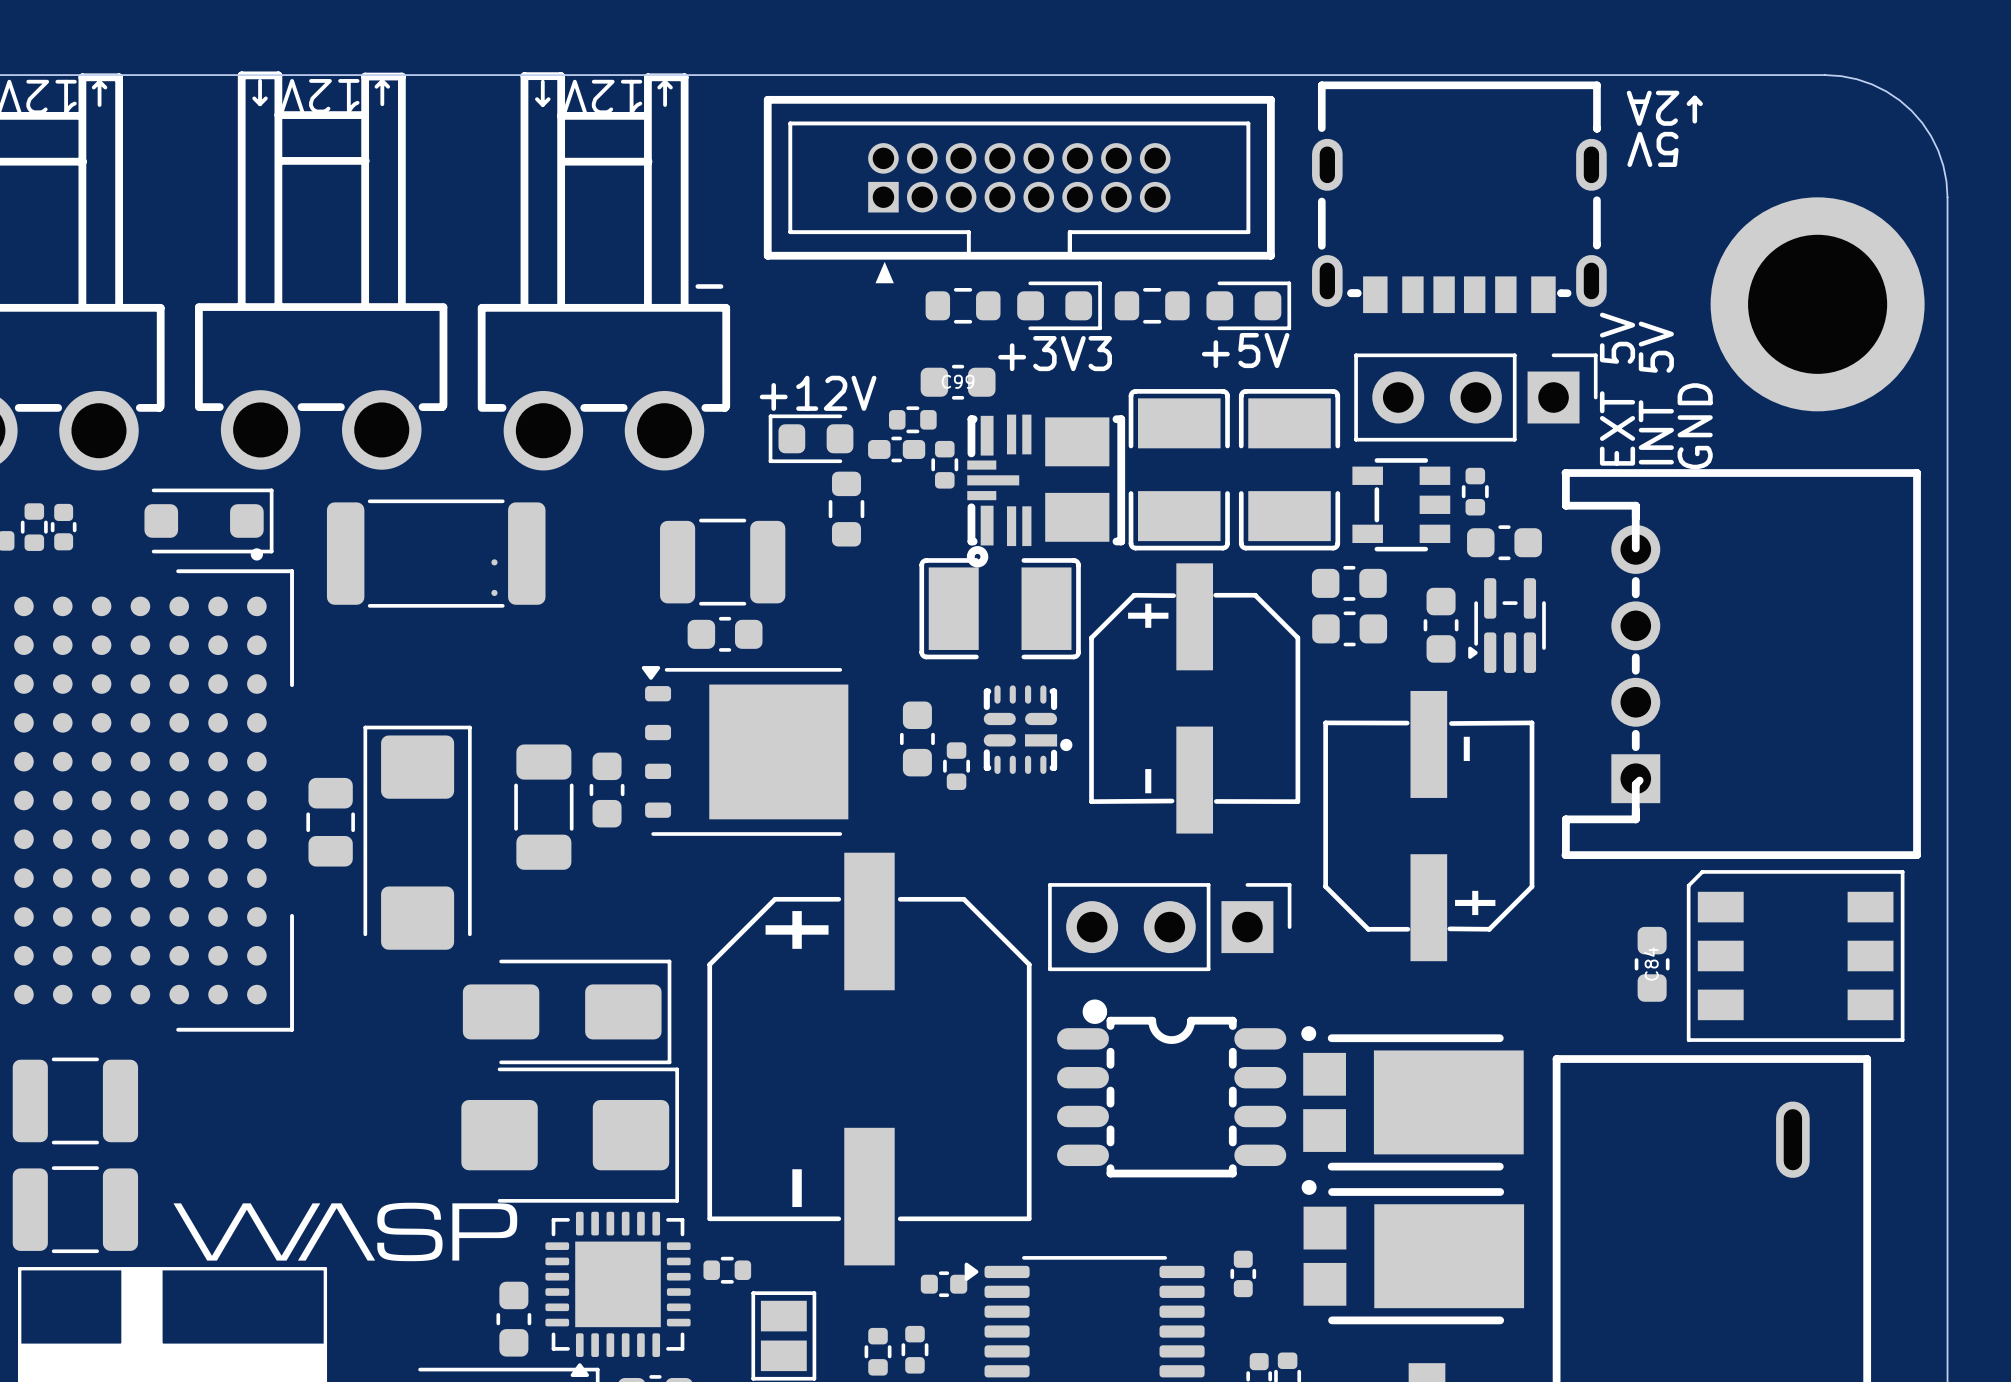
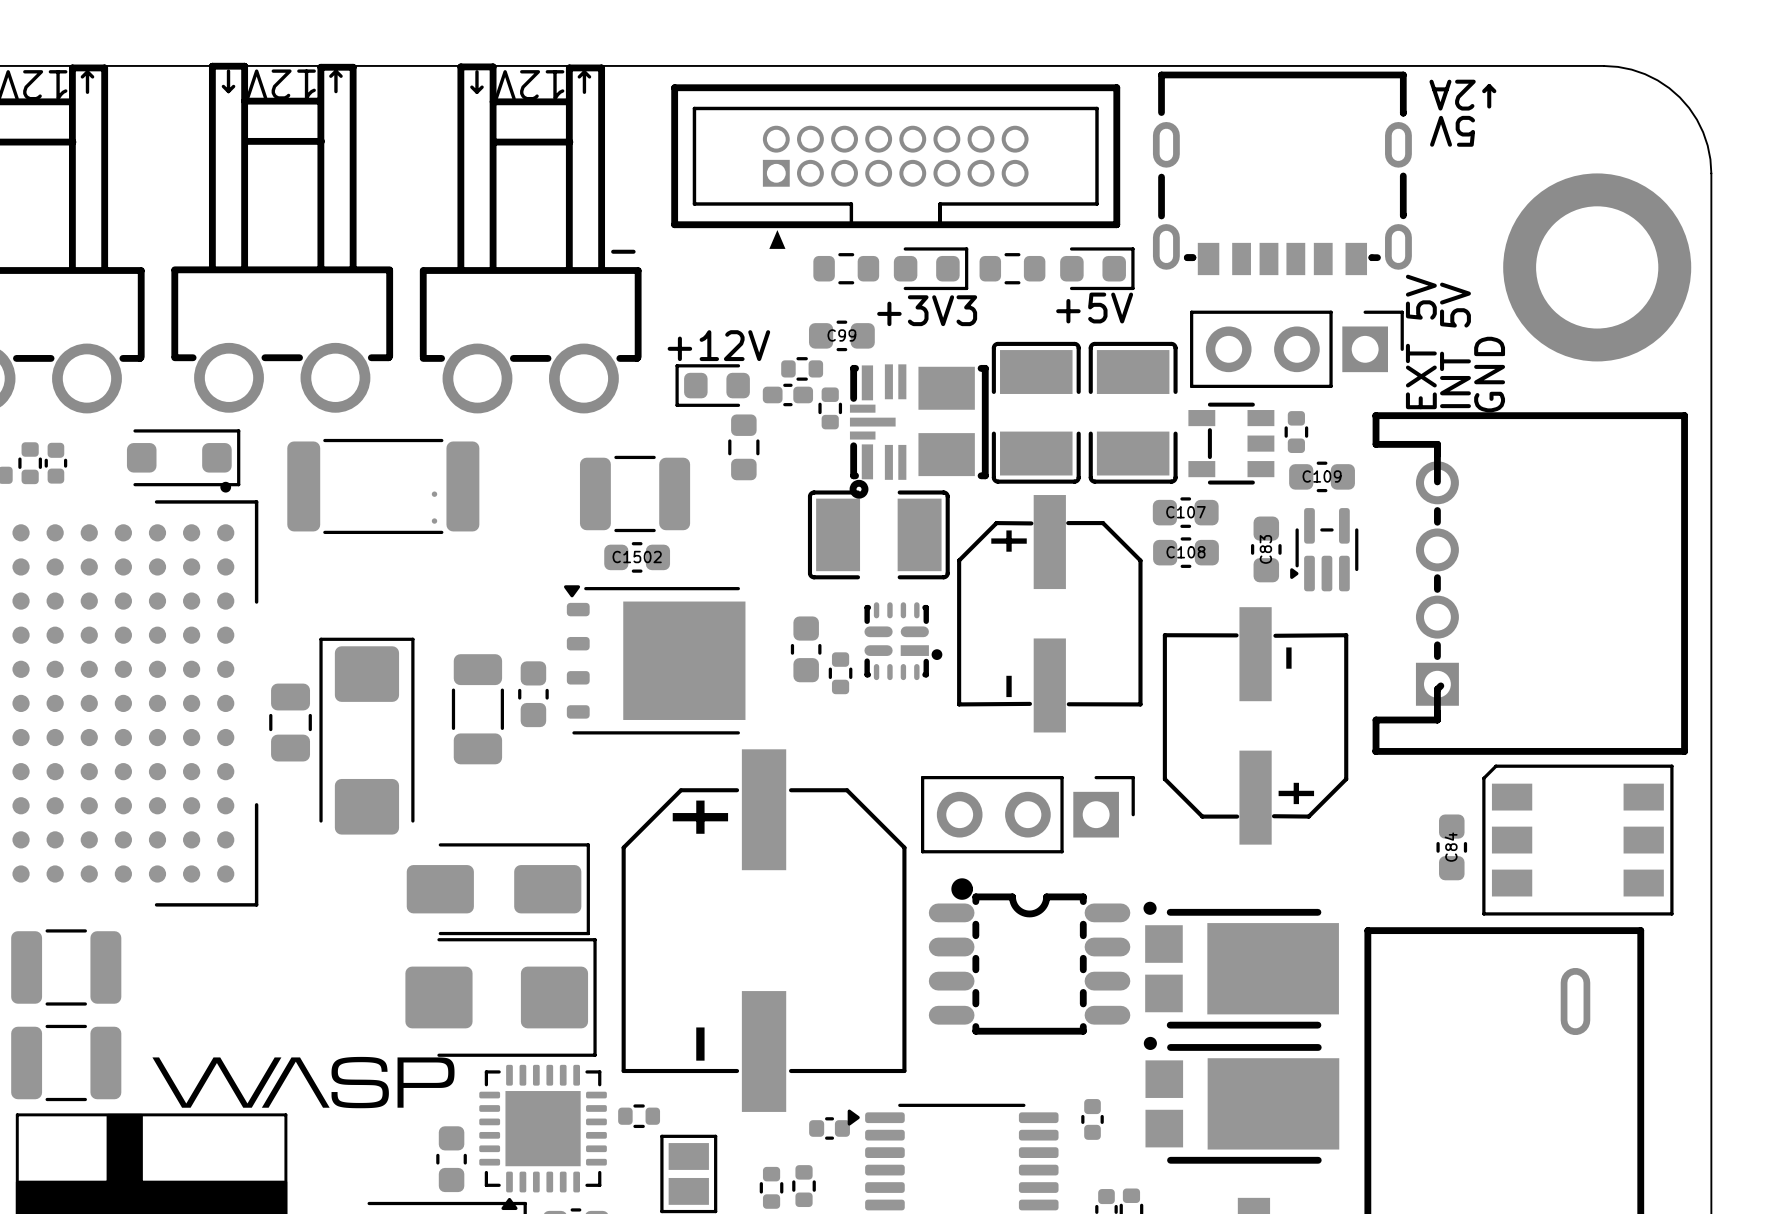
C109 name: none -> C109 (1322, 476)
C107 name: none -> C107 (1185, 512)
C83 name: none -> C83 (1265, 549)
C108 name: none -> C108 (1185, 552)
C1502 name: none -> C1502 (637, 557)

